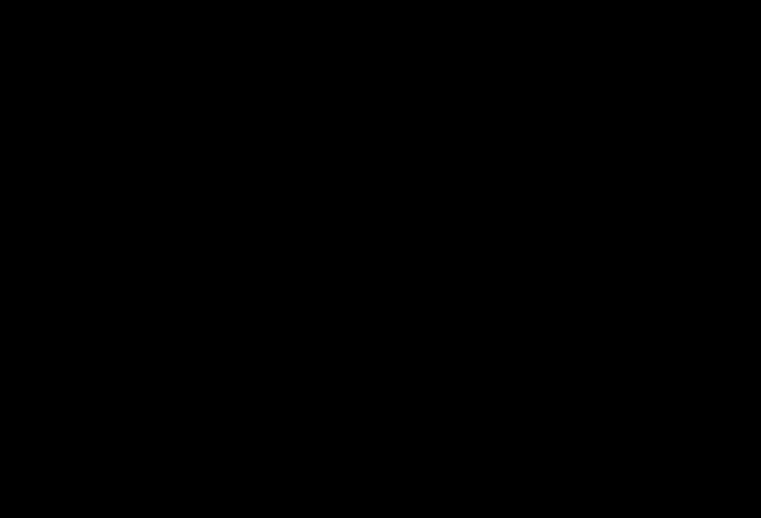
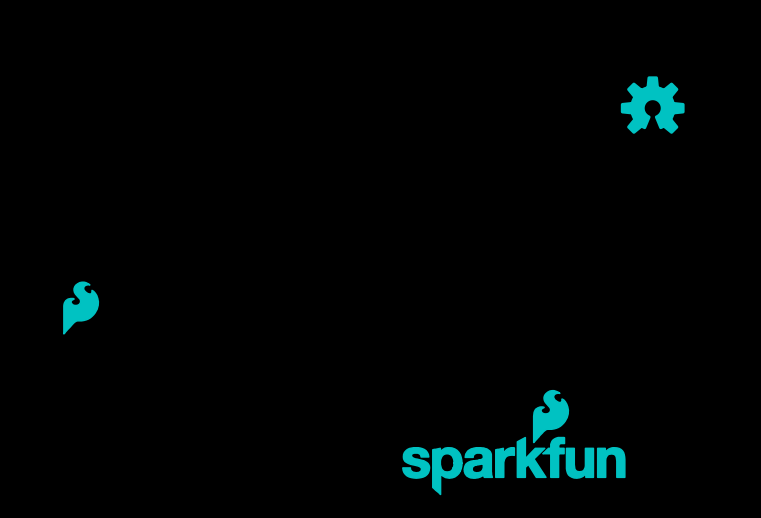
drawing: none -> [620, 76, 685, 134]
drawing: none -> [63, 281, 100, 335]
drawing: none -> [402, 389, 626, 496]

